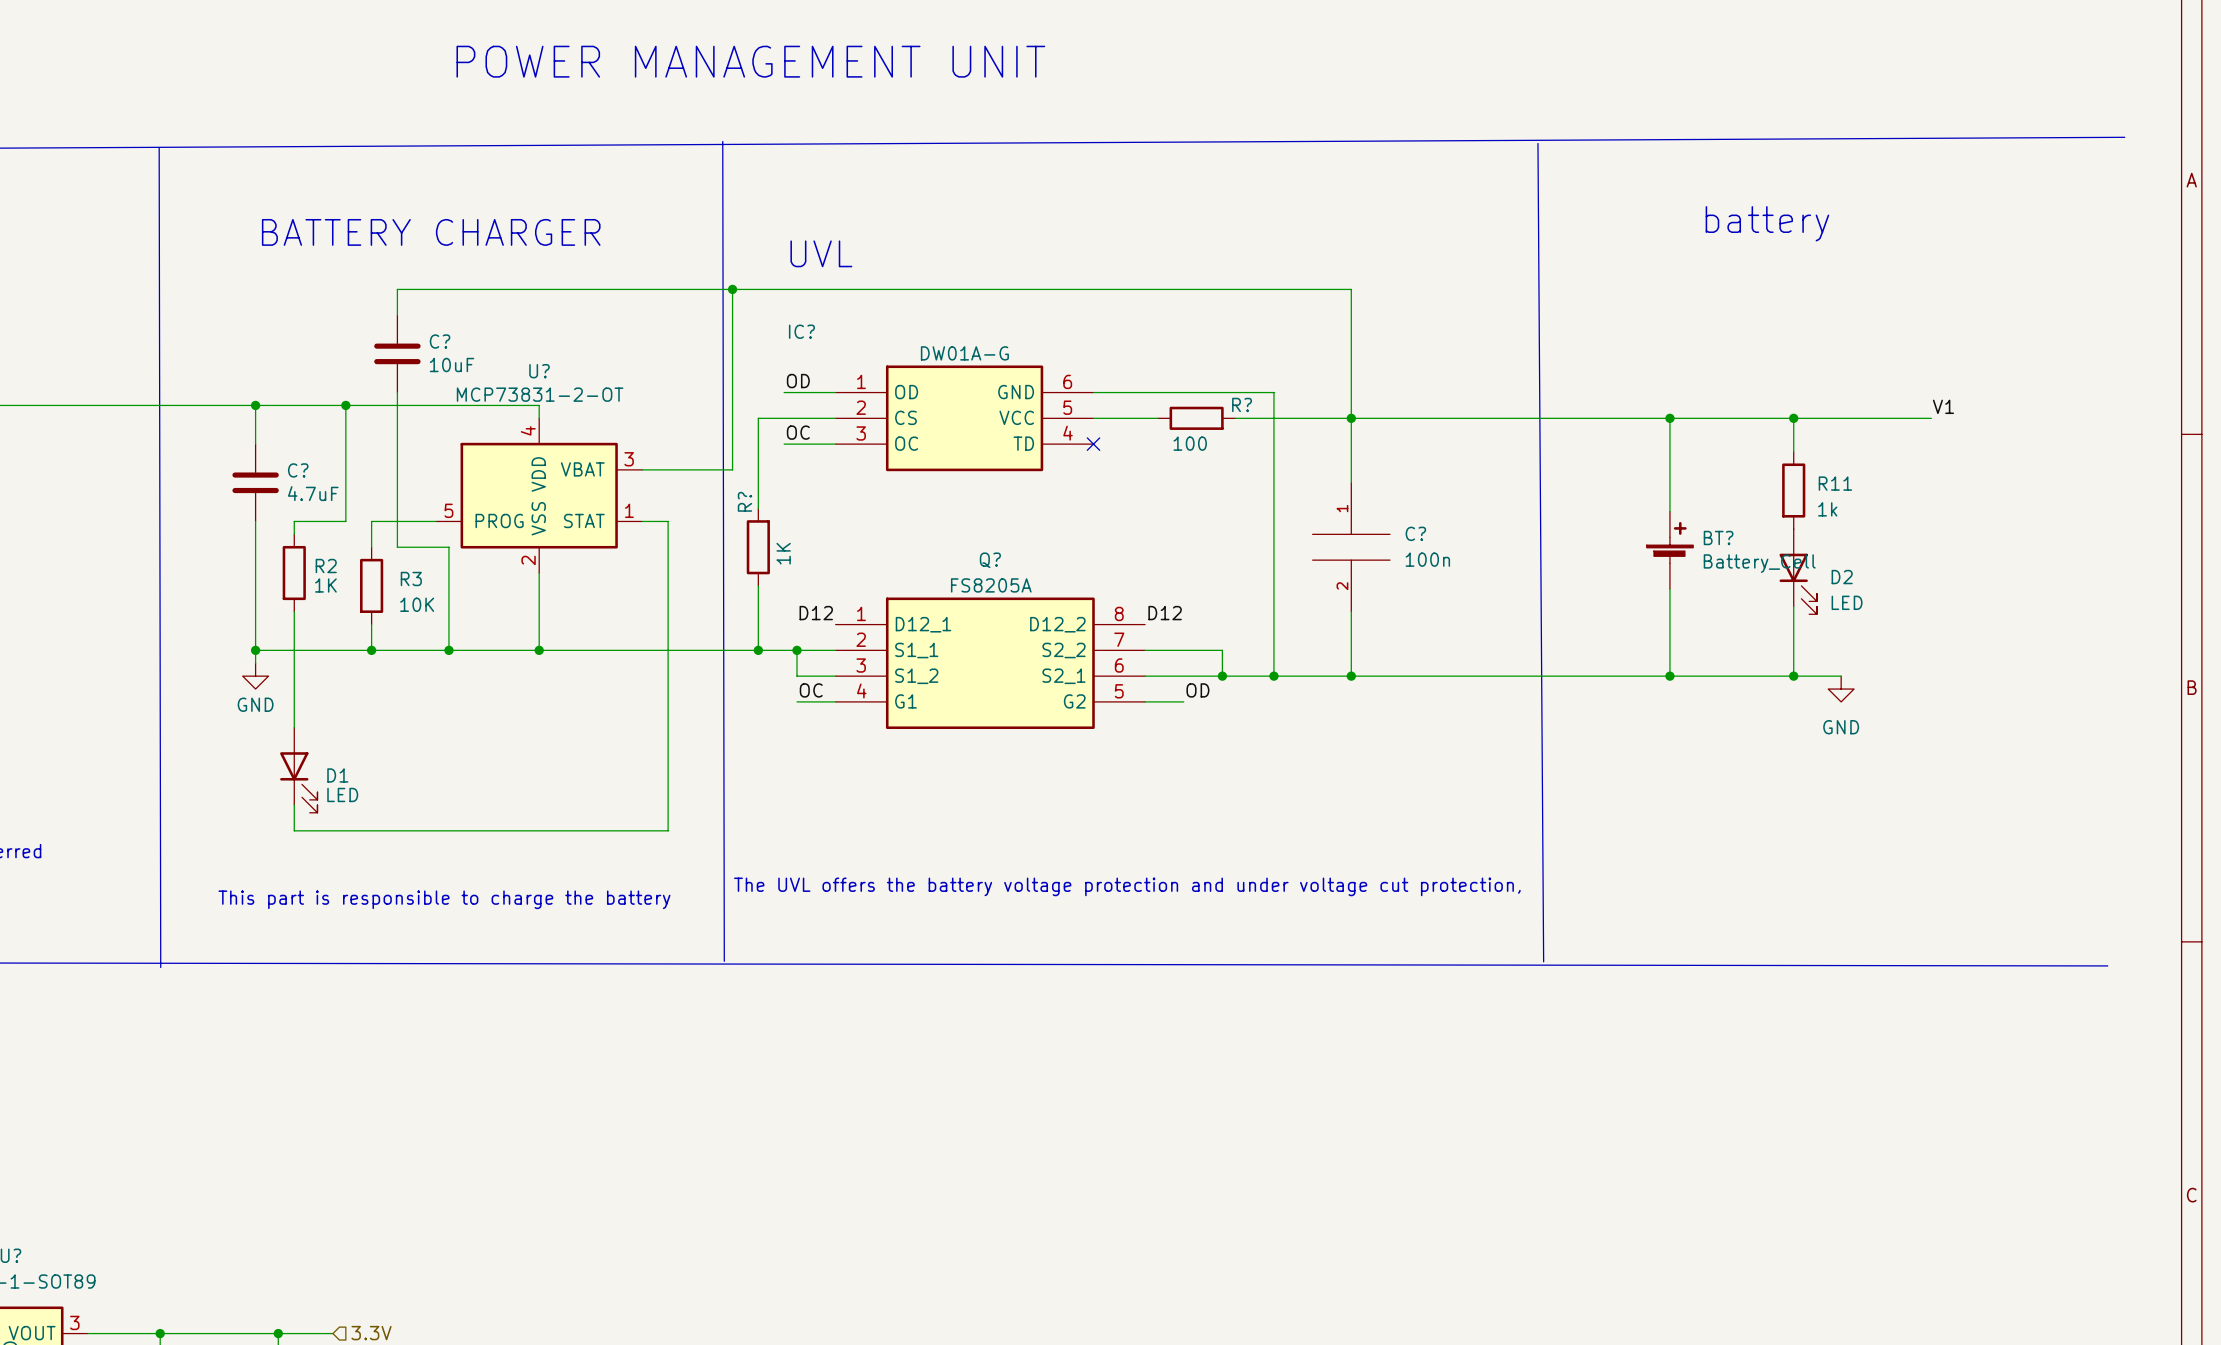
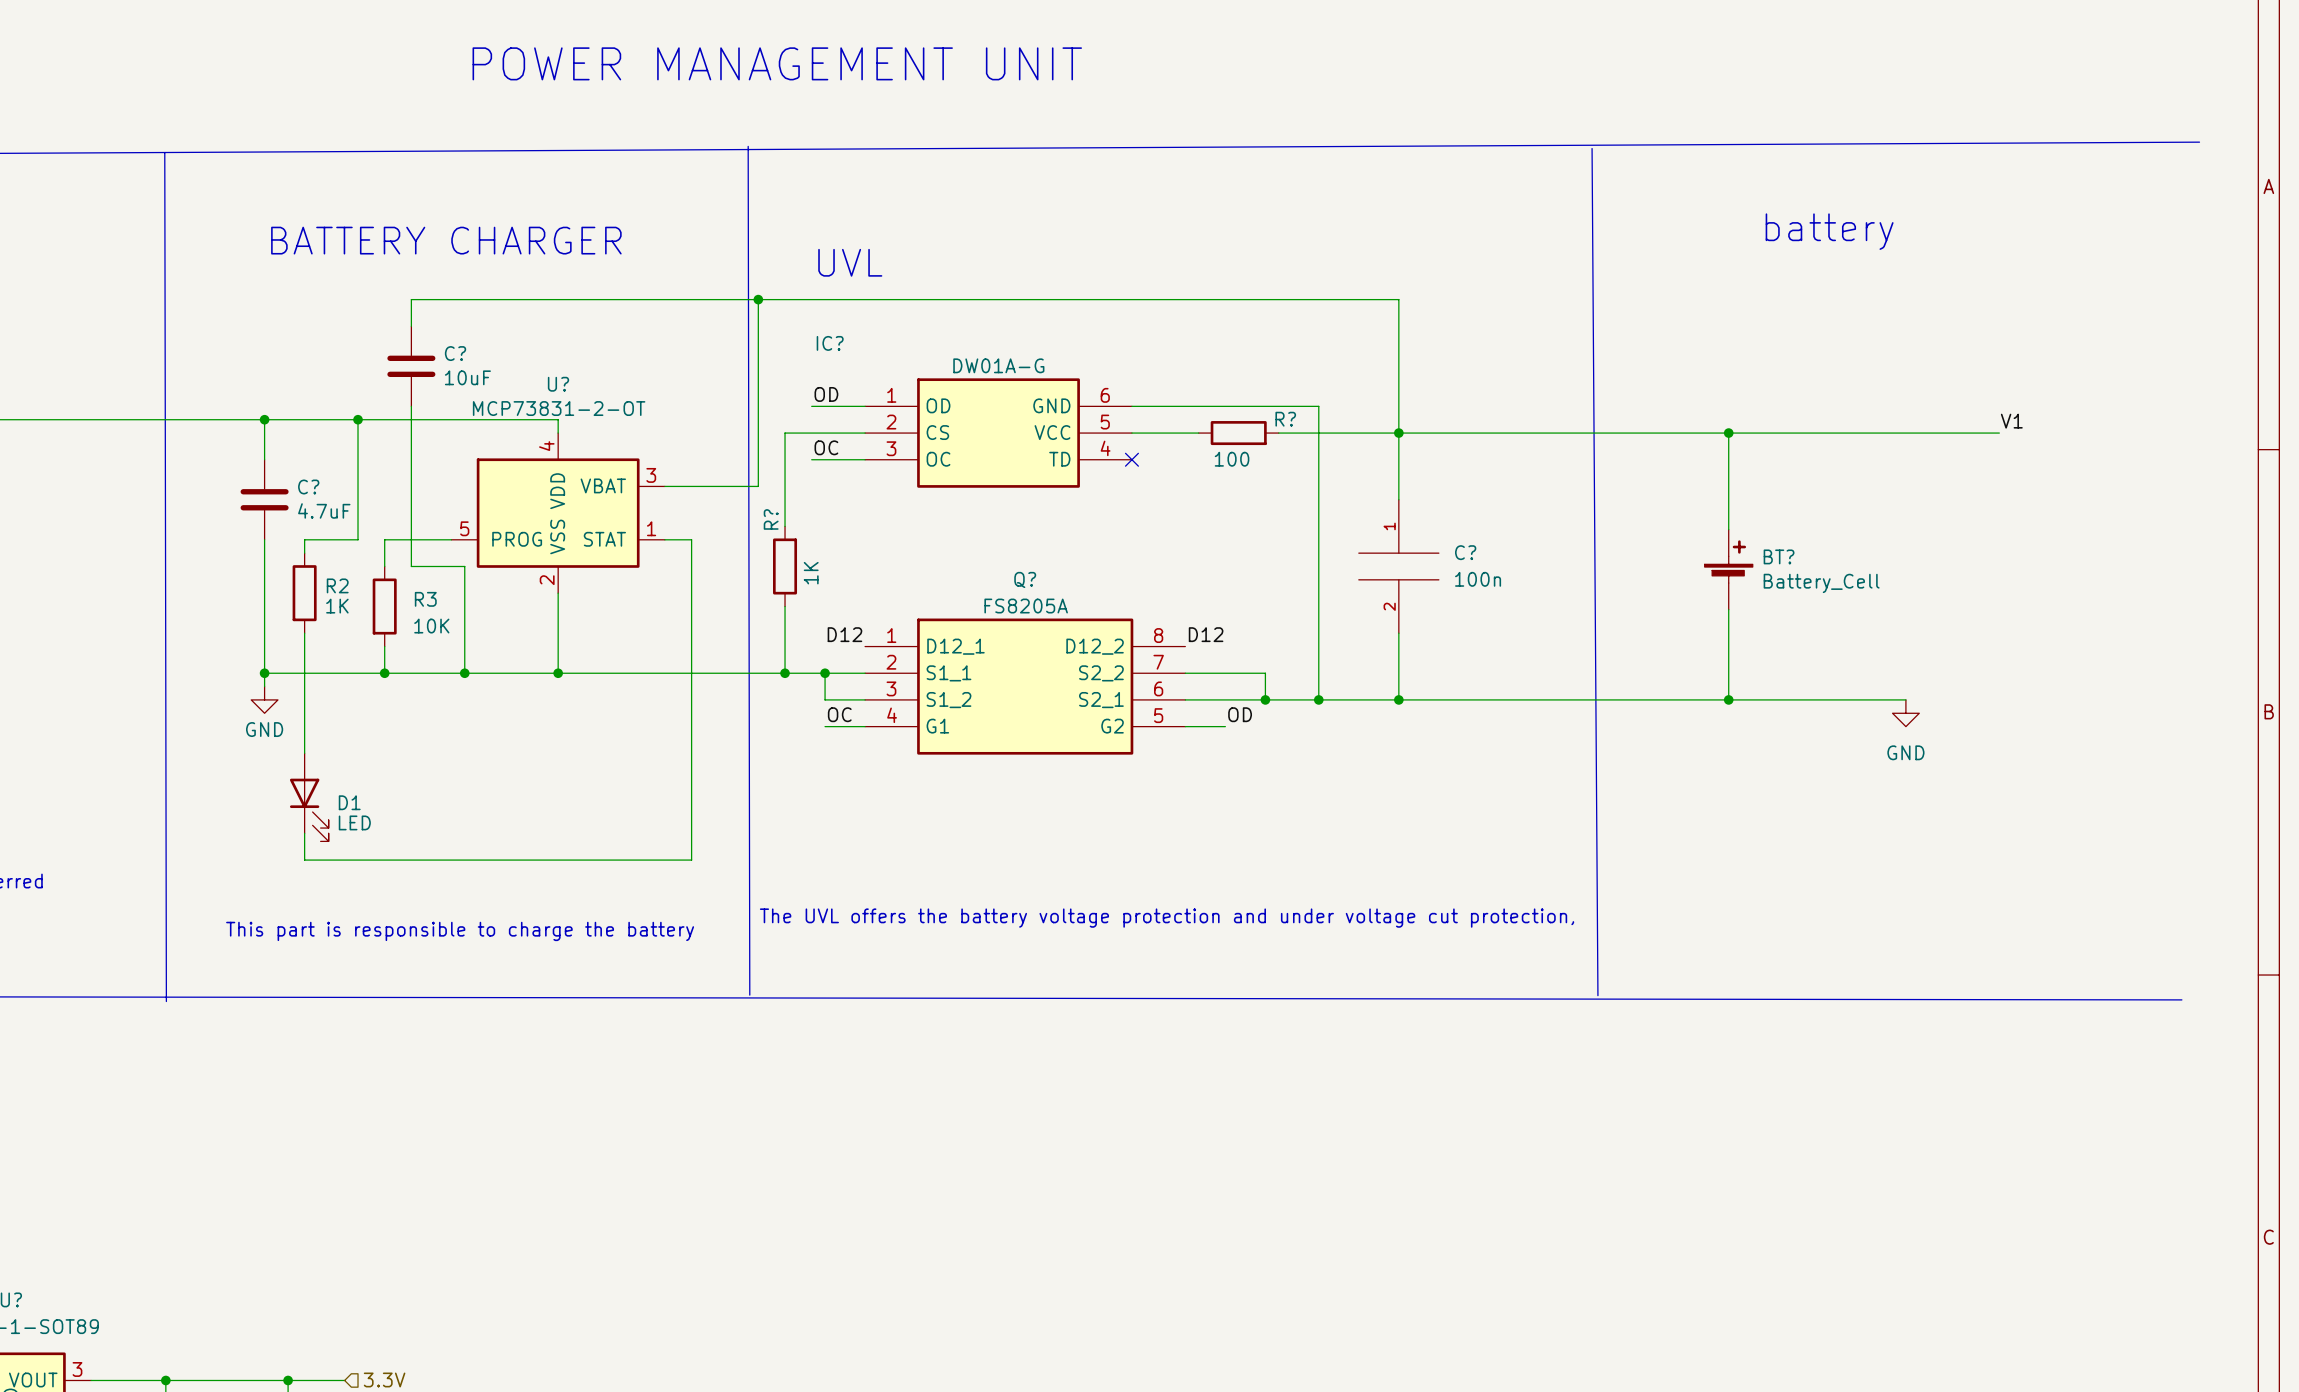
wire: (1793, 418) (1793, 451) -> none
junction: (1793, 418) -> none
R11: 1k (1793, 490) -> none
D2: LED (1798, 571) -> none
wire: (1793, 606) (1793, 676) -> none
junction: (1793, 676) -> none

